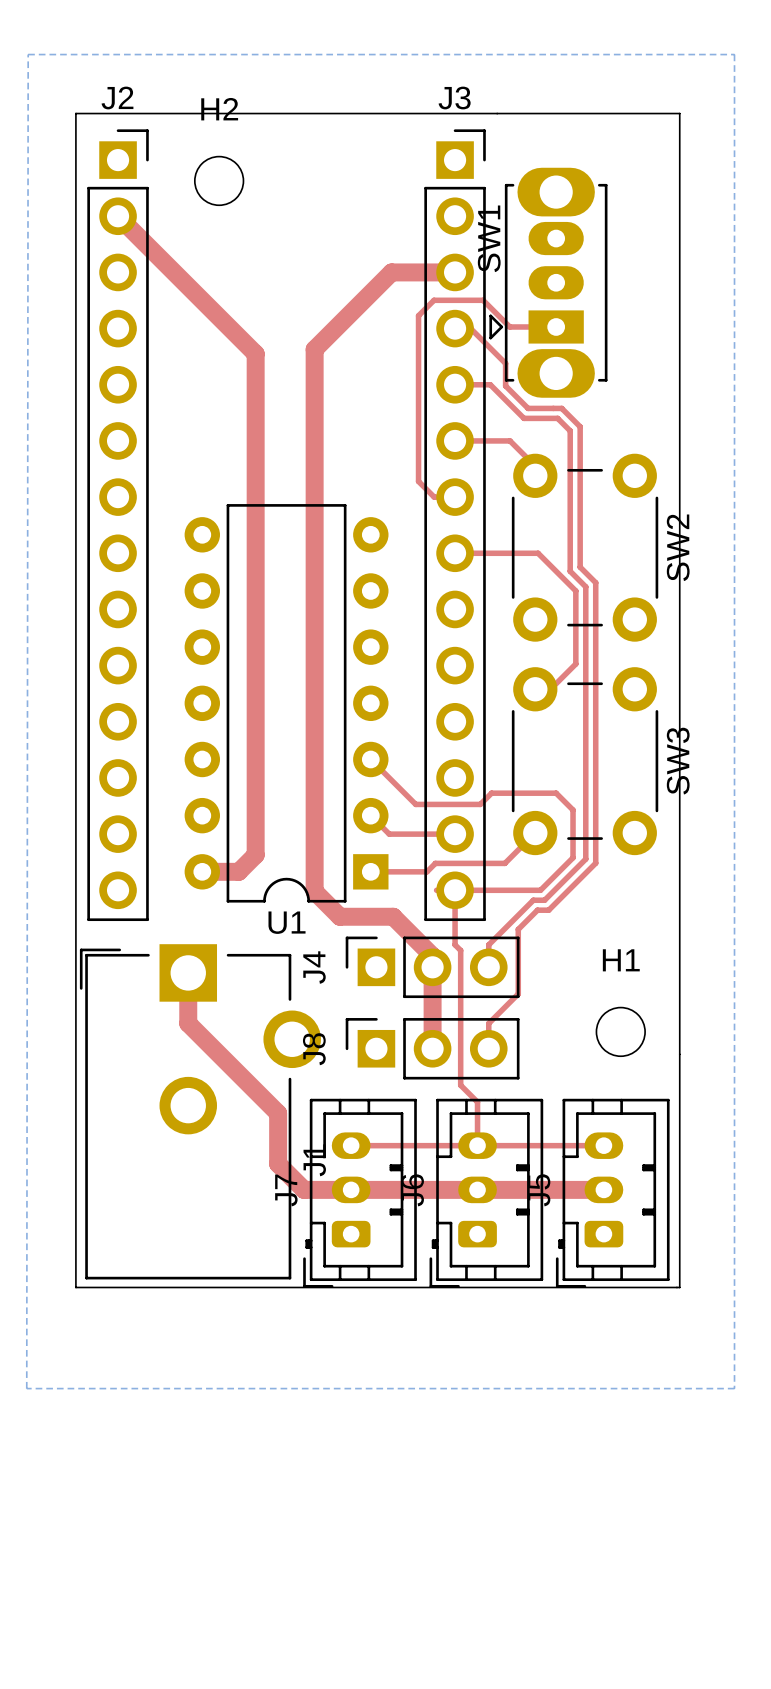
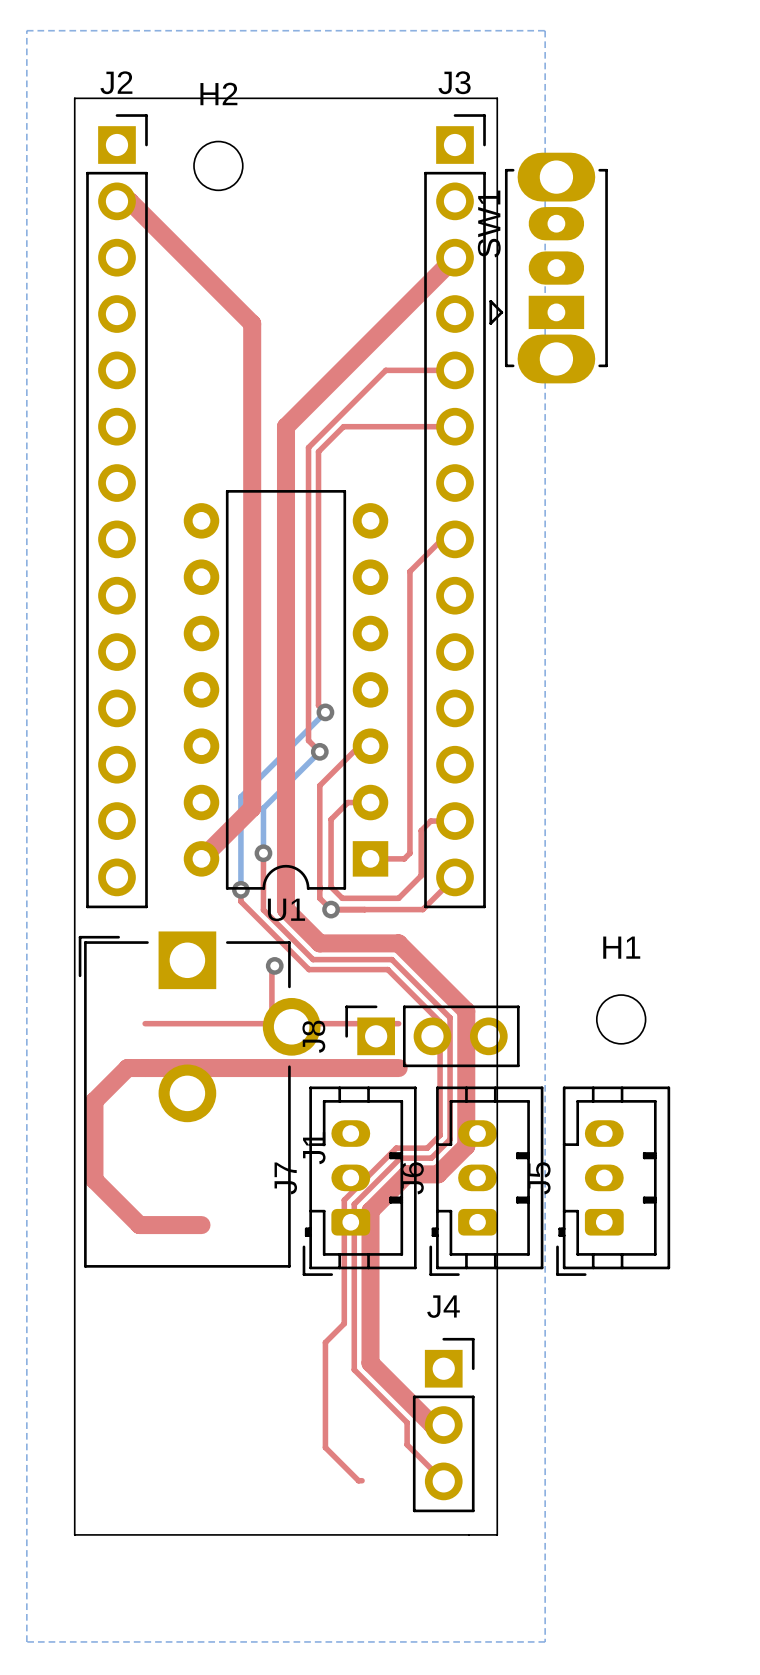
bottom zone outline: (28, 54) (734, 54) (734, 1388) (26, 1388) (28, 54) -> (26, 30) (26, 1641) (545, 1641) (545, 30) (26, 30)
board edge: (497, 113) (679, 113) (679, 1287) (75, 1287) -> (497, 98) (497, 1534) (74, 1534) (74, 1275)
top track: (118, 216) (255, 353) (255, 854) (238, 871) (202, 871) -> (116, 201) (129, 201) (252, 323) (252, 808) (201, 858)
top track: (455, 272) (391, 272) (314, 349) (314, 891) (339, 916) (393, 916) (432, 956) (432, 1048) -> (455, 257) (285, 426) (285, 909) (319, 943) (398, 943) (466, 1010) (466, 1146) (438, 1174) (407, 1174) (370, 1210) (370, 1363) (432, 1425) (443, 1425)
top track: (556, 326) (509, 326) (483, 300) (434, 300) (418, 315) (418, 481) (434, 497) (455, 497) -> none
top track: (455, 328) (470, 328) (505, 363) (505, 385) (528, 408) (561, 408) (580, 426) (580, 567) (595, 582) (595, 863) (548, 910) (537, 910) (518, 929) (518, 993) (488, 1023) (488, 1048) -> none
top track: (455, 384) (490, 384) (523, 418) (557, 418) (570, 430) (570, 571) (585, 586) (585, 859) (544, 900) (533, 900) (488, 944) (488, 967) -> (455, 370) (385, 370) (308, 447) (308, 740) (319, 751)
top track: (455, 440) (510, 440) (535, 466) (535, 475) -> (455, 426) (343, 426) (318, 451) (318, 705) (325, 712)
SW2: (585, 547) -> none
top track: (455, 553) (538, 553) (575, 590) (575, 664) (550, 689) (535, 689) -> (455, 539) (442, 539) (409, 571) (409, 853) (404, 858)
bottom track: none -> (325, 712) (240, 796) (240, 889)
via: none -> (325, 712)
top track: (370, 759) (415, 804) (480, 804) (491, 793) (556, 793) (573, 810) (573, 857) (540, 890) (436, 890) -> (370, 746) (359, 746) (319, 785) (319, 898) (331, 909) (422, 909) (455, 877)
SW3: (585, 761) -> none
bottom track: none -> (319, 751) (263, 808) (263, 853)
via: none -> (319, 751)
top track: (370, 815) (389, 834) (430, 834) -> (370, 802) (347, 802) (331, 819) (331, 887) (342, 898) (398, 898) (421, 875) (421, 830) (430, 821)
top track: (535, 833) (504, 863) (435, 863) (426, 871) (404, 871) -> none
top track: none -> (263, 853) (263, 909) (313, 959) (391, 959) (450, 1017) (450, 1139) (431, 1158) (400, 1158) (354, 1204) (354, 1369) (407, 1422) (407, 1444) (443, 1481)
via: none -> (263, 853)
top track: (455, 890) (455, 944) (460, 950) (460, 1085) (477, 1102) (477, 1145) -> none
top track: none -> (240, 889) (240, 901) (308, 969) (387, 969) (440, 1021) (440, 1135) (427, 1148) (396, 1148) (344, 1200) (344, 1323) (325, 1342) (325, 1447) (358, 1480) (362, 1480)
via: none -> (240, 889)
via: none -> (331, 909)
J4 rotation: 0° (432, 967) -> 90° clockwise (443, 1425)
J4 position: (432, 967) -> (443, 1425)
top track: (188, 972) (188, 1023) (278, 1113) (278, 1163) (304, 1189) (603, 1189) -> none
via: none -> (274, 965)
top track: none -> (271, 968) (271, 1023)
top track: none -> (398, 1068) (127, 1068) (94, 1101) (94, 1180) (139, 1225) (201, 1225)
top track: (351, 1145) (603, 1145) -> (145, 1023) (398, 1023)

